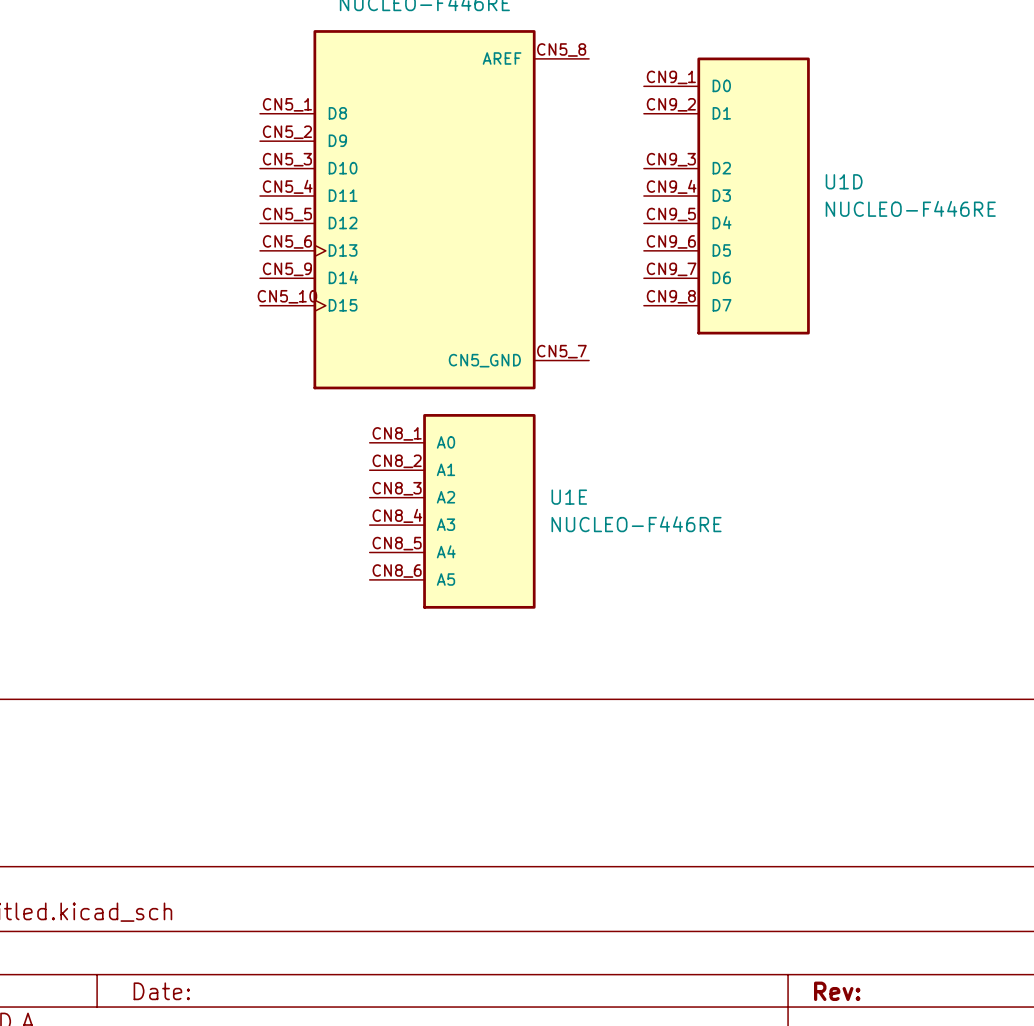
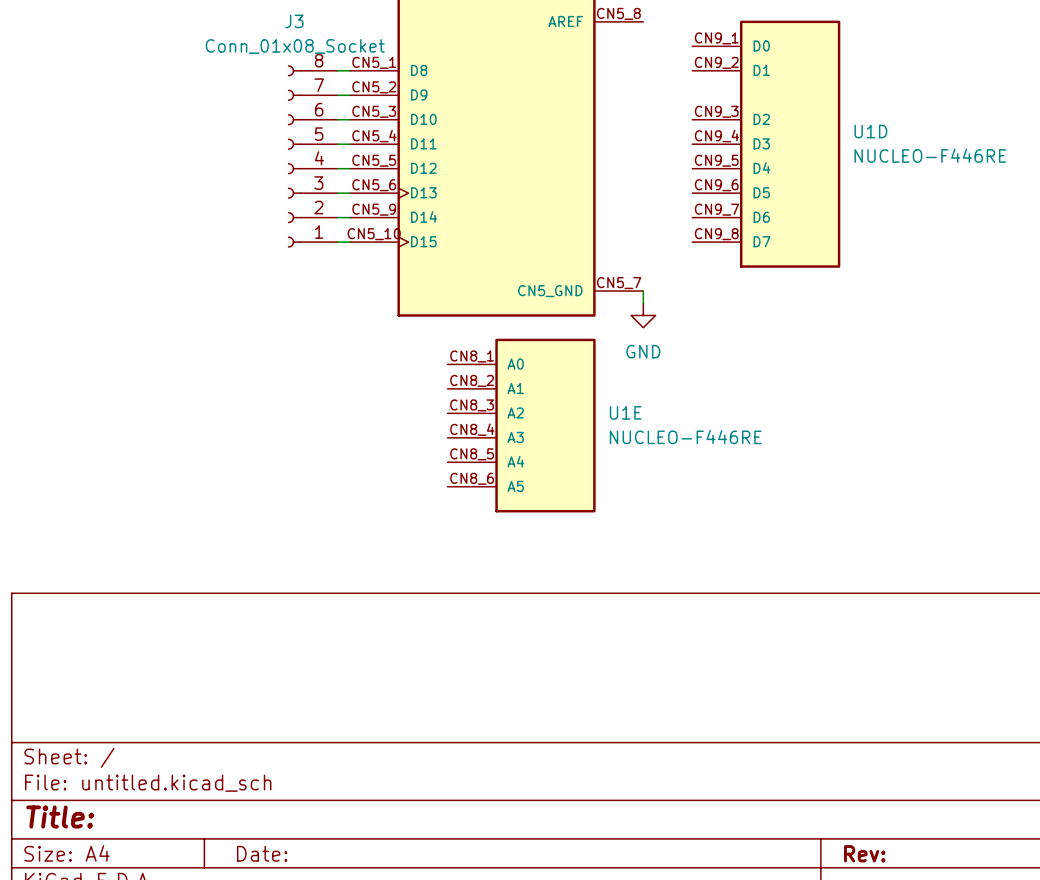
wire: none -> (337, 70) (349, 70)
wire: none -> (337, 95) (349, 95)
wire: none -> (337, 119) (349, 119)
wire: none -> (337, 144) (349, 144)
J3: none -> Conn_01x08_Socket (312, 156)
wire: none -> (337, 168) (349, 168)
wire: none -> (337, 193) (349, 193)
wire: none -> (337, 217) (349, 217)
wire: none -> (337, 242) (349, 242)
wire: none -> (643, 291) (643, 303)
power symbol: none -> GND (643, 315)

